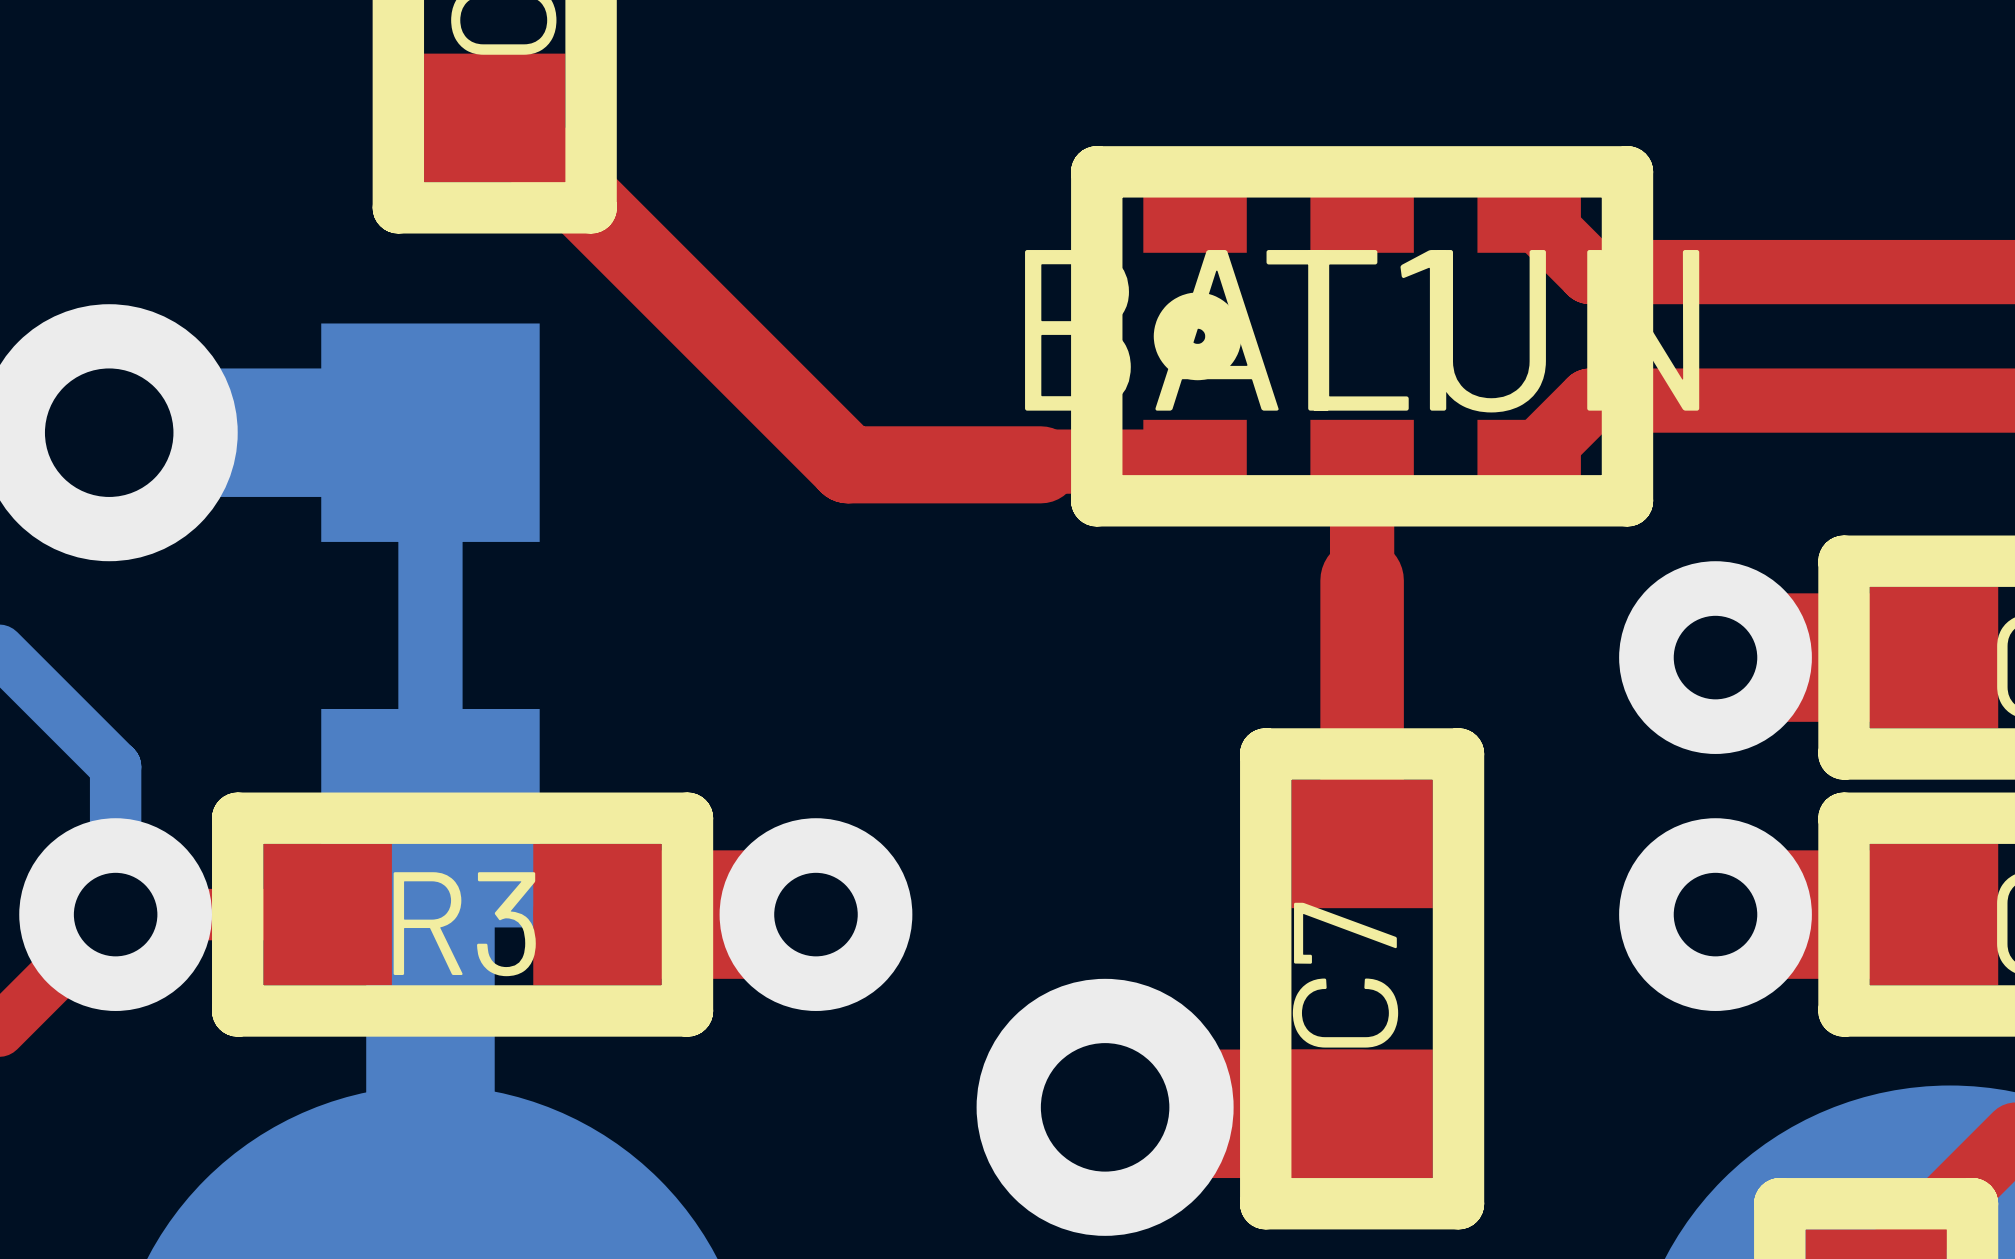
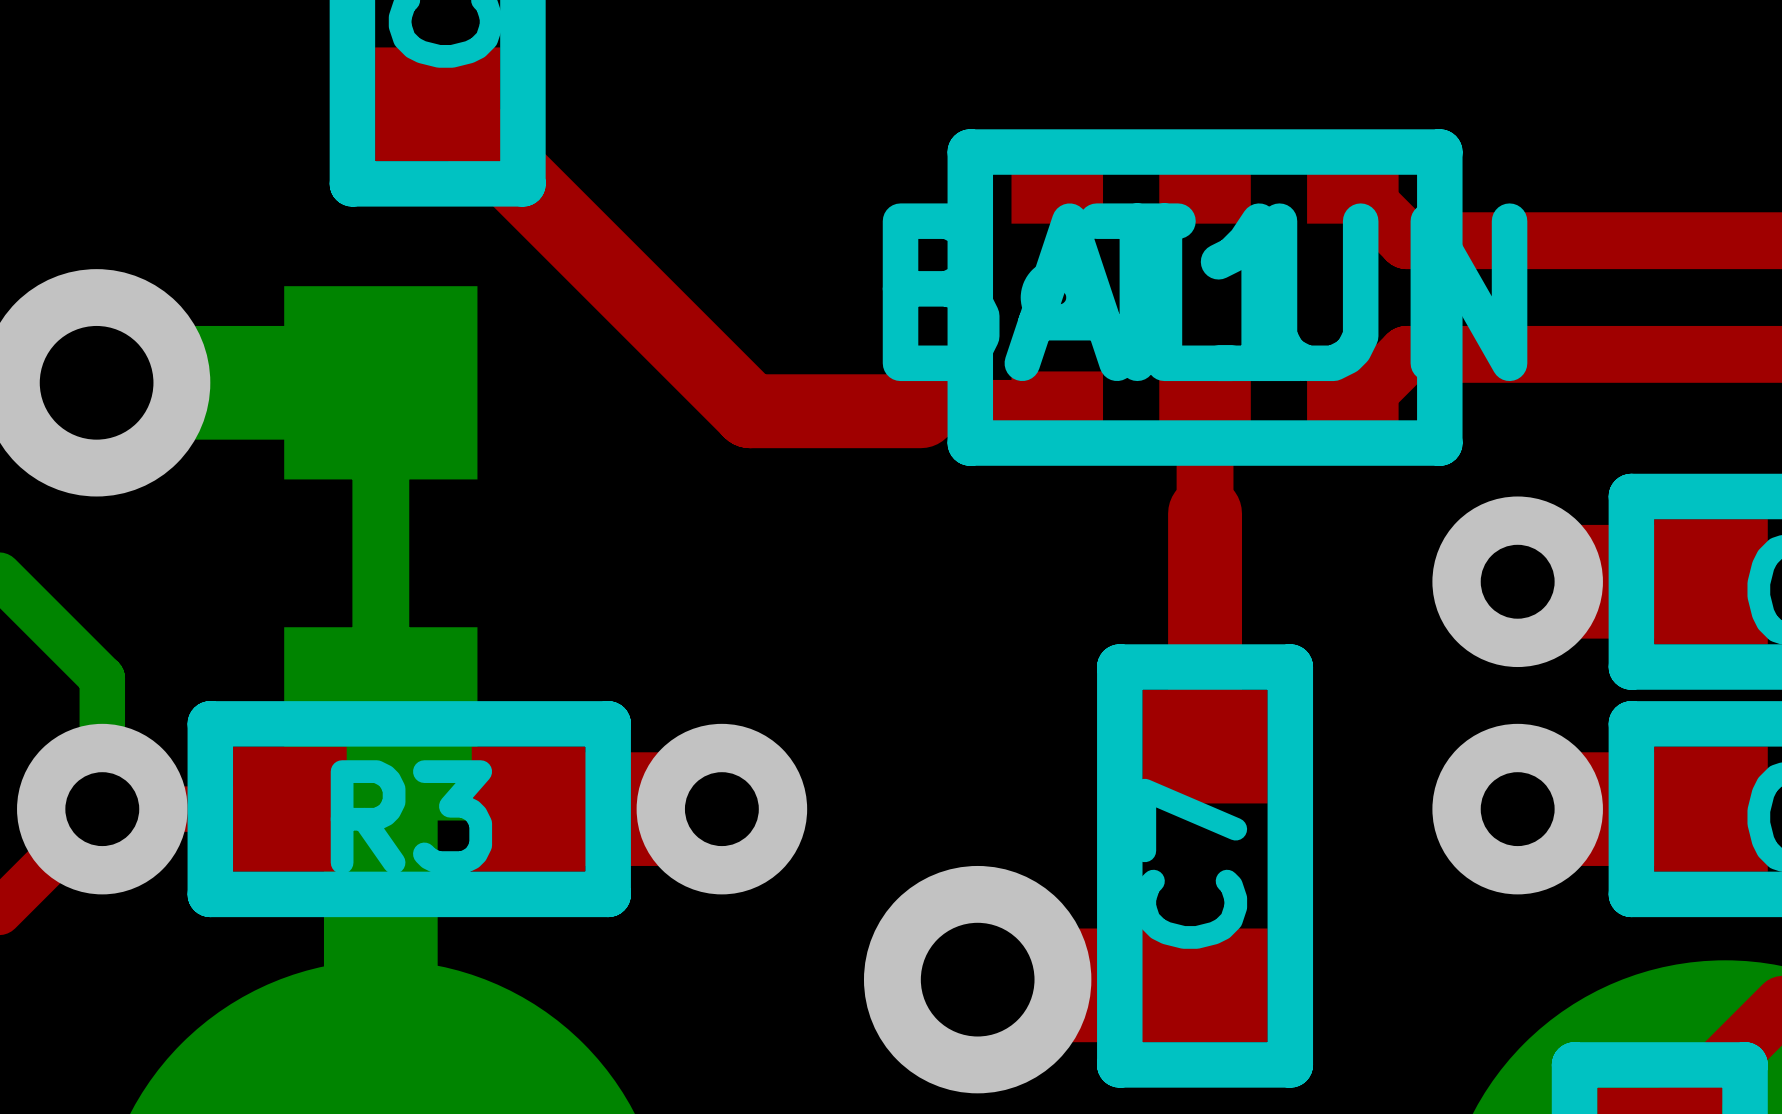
top track width: thin (501, 117) (848, 464) (1040, 464) -> thick (443, 104) (750, 411) (920, 411)

